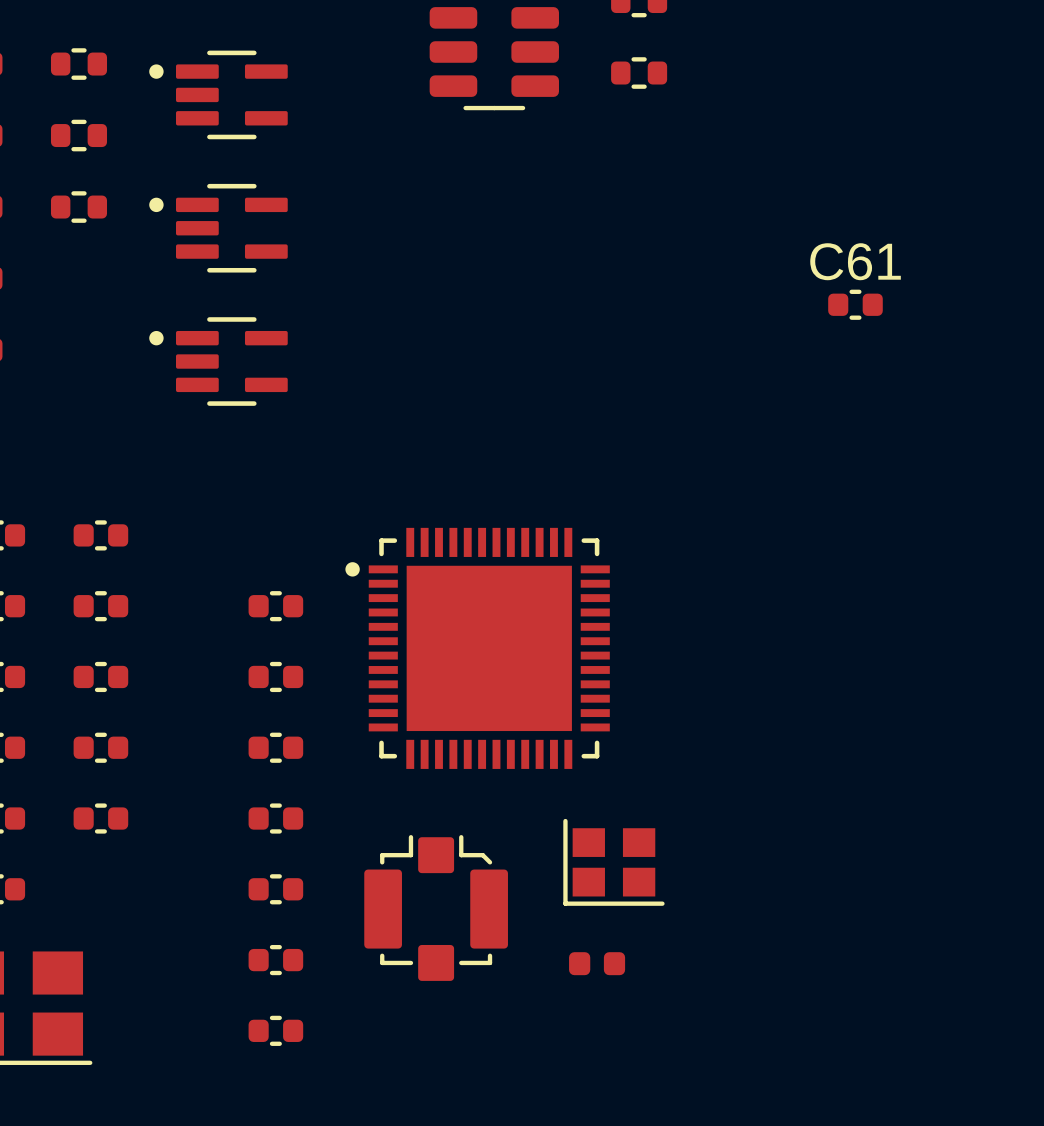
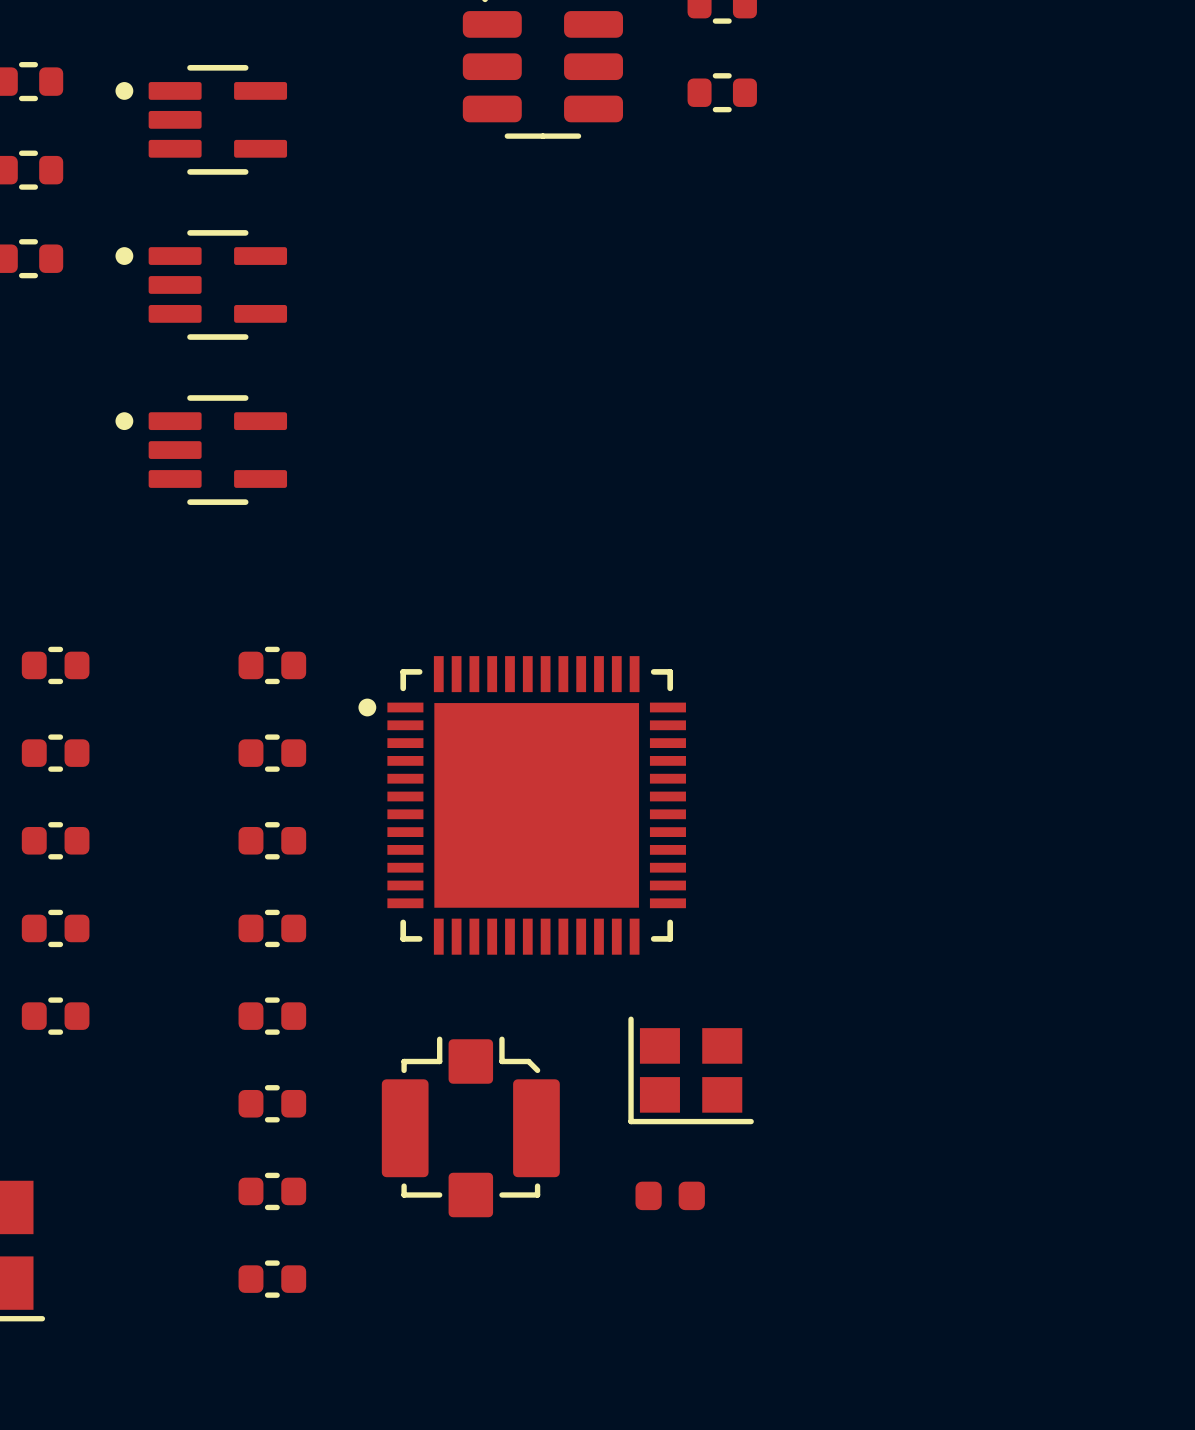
C61: (855, 304) -> none
part: none -> (272, 665)

